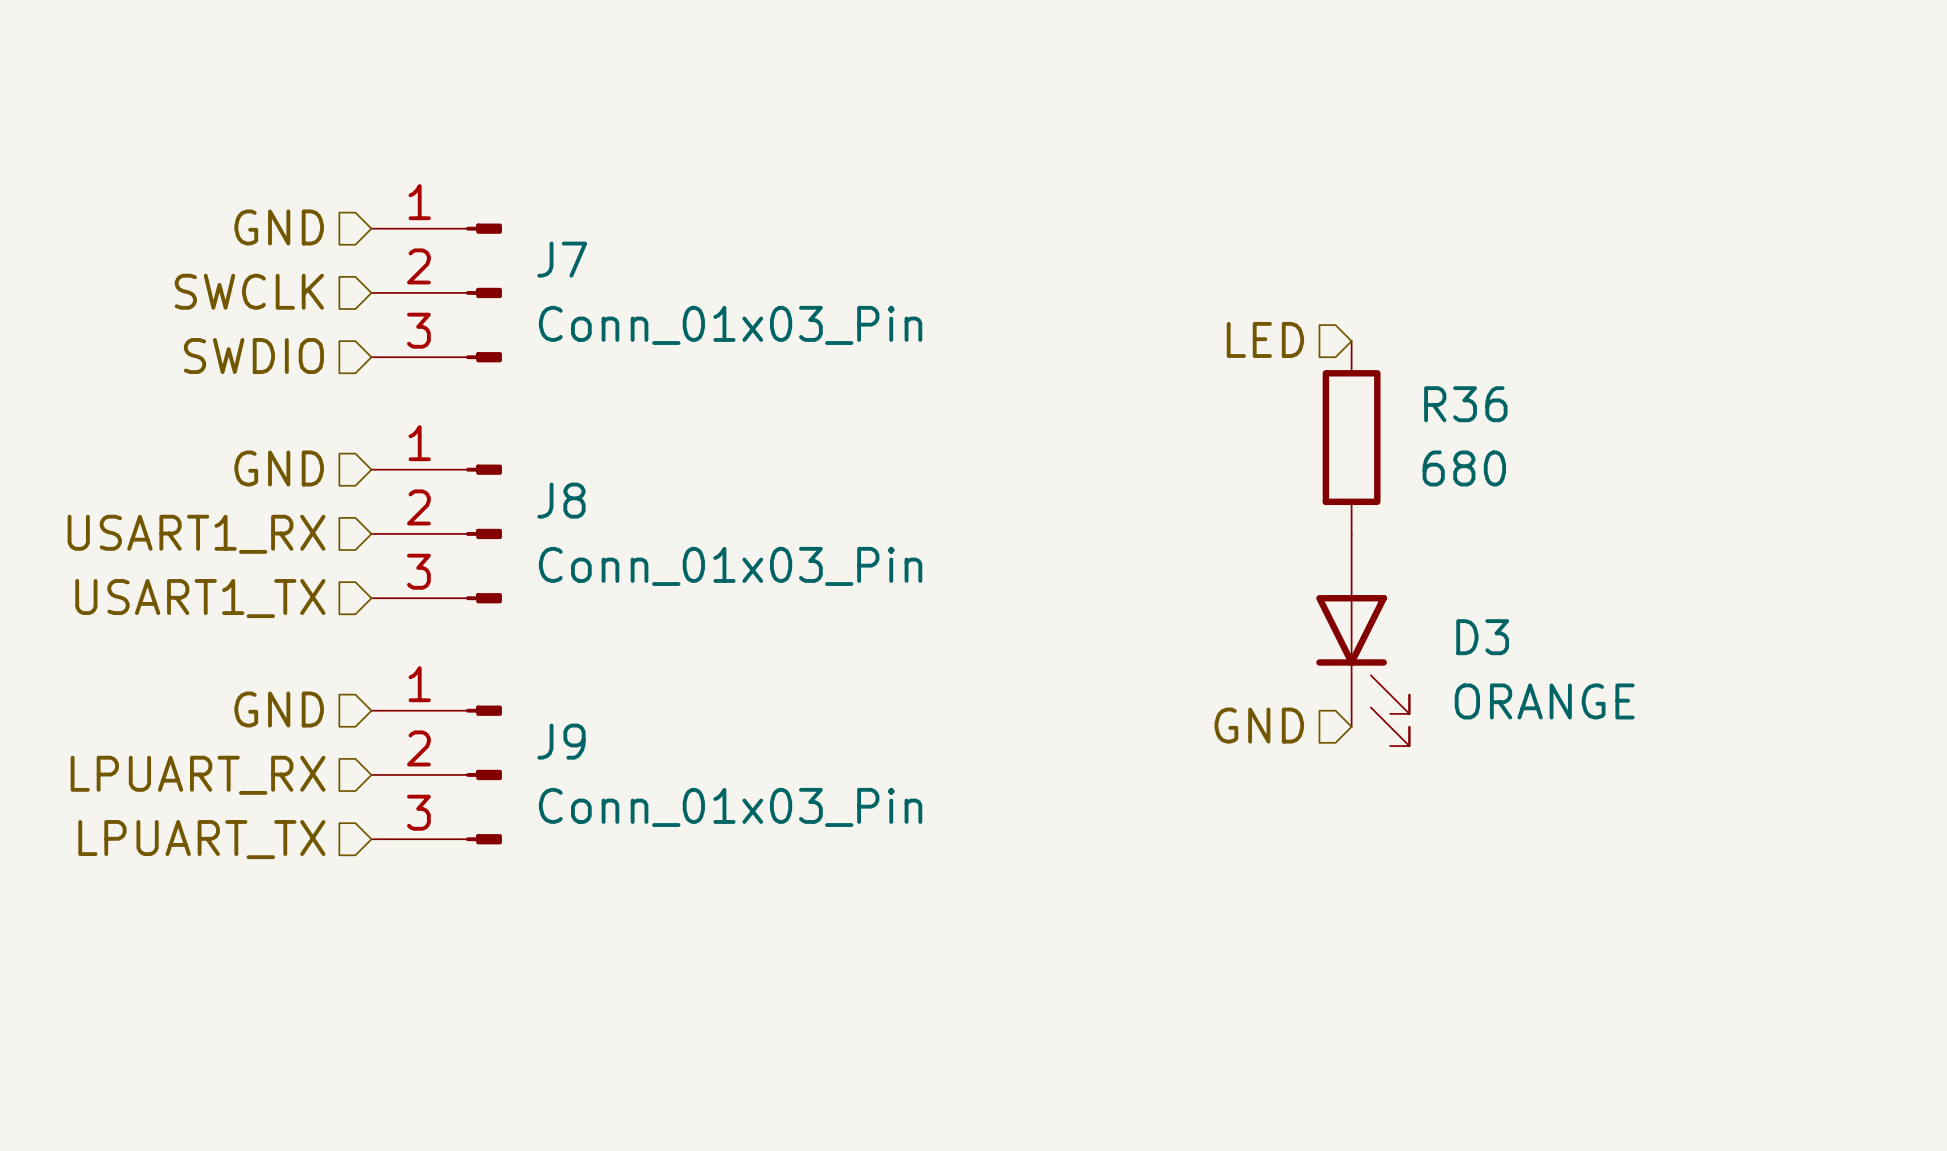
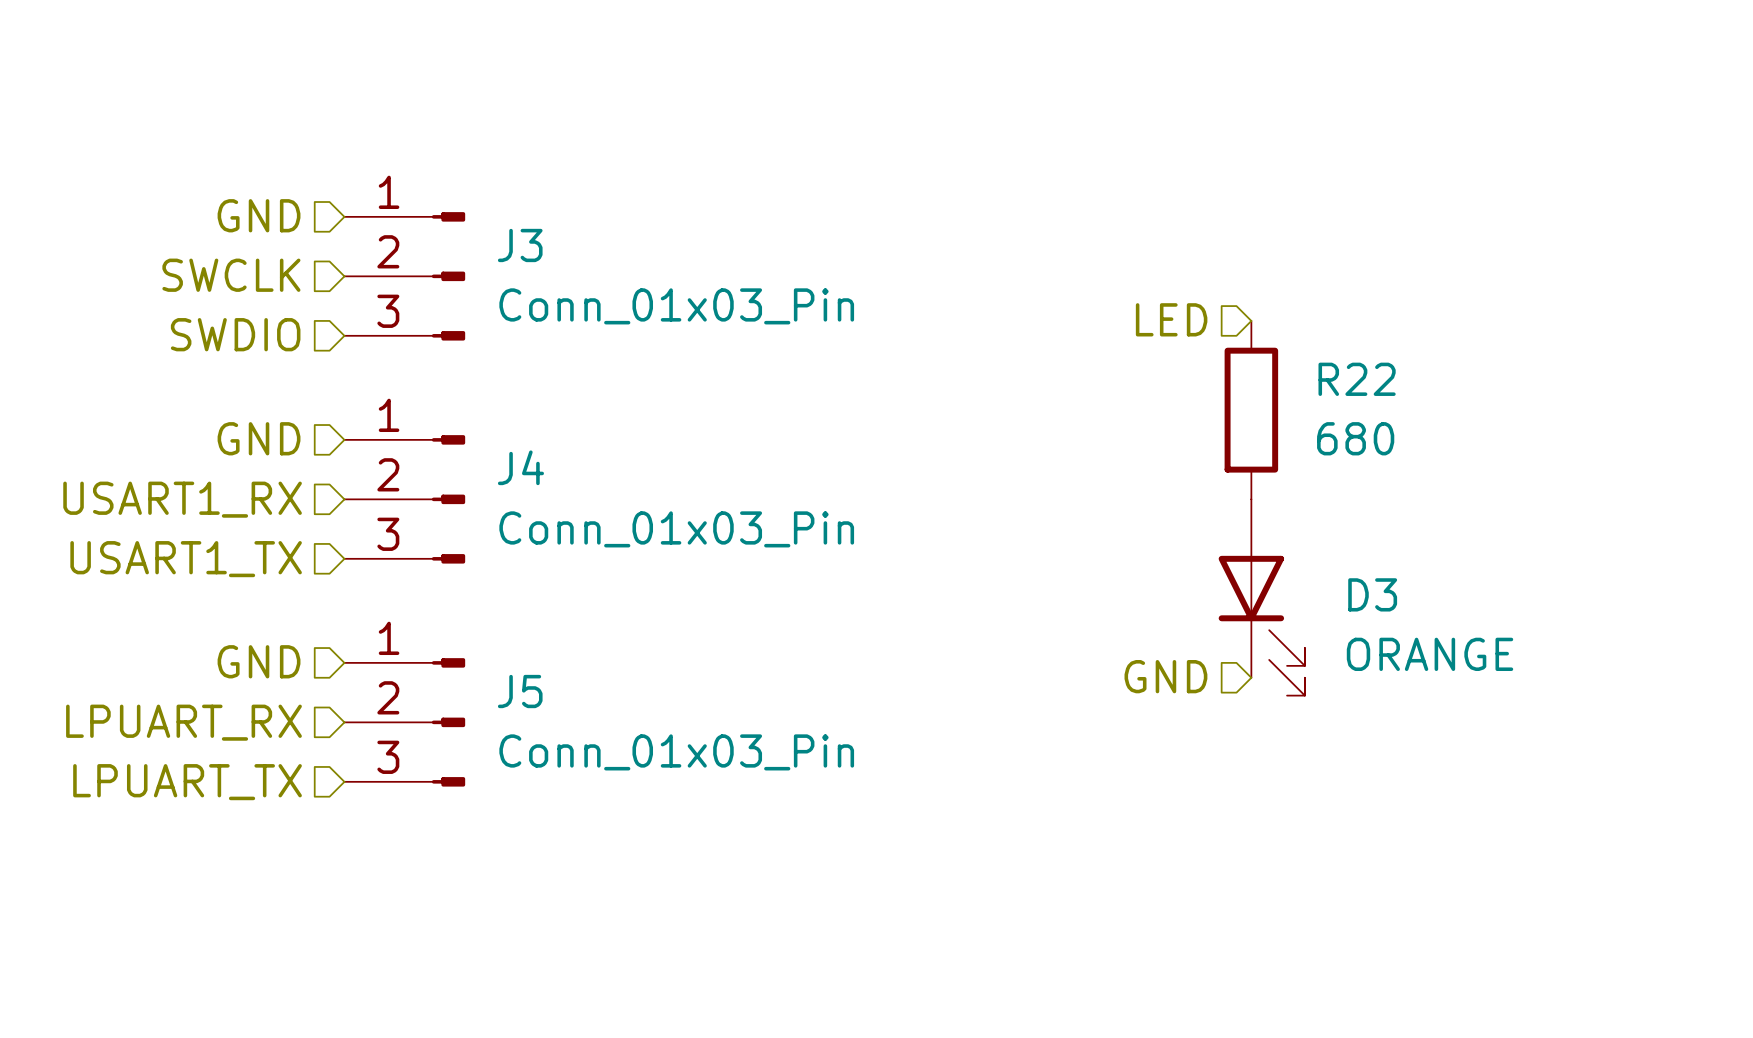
J7 name: J7 (562, 259) -> J3 (520, 245)
R36 name: R36 (1465, 404) -> R22 (1357, 379)
J8 name: J8 (561, 500) -> J4 (520, 467)
J9 name: J9 (561, 741) -> J5 (520, 691)

